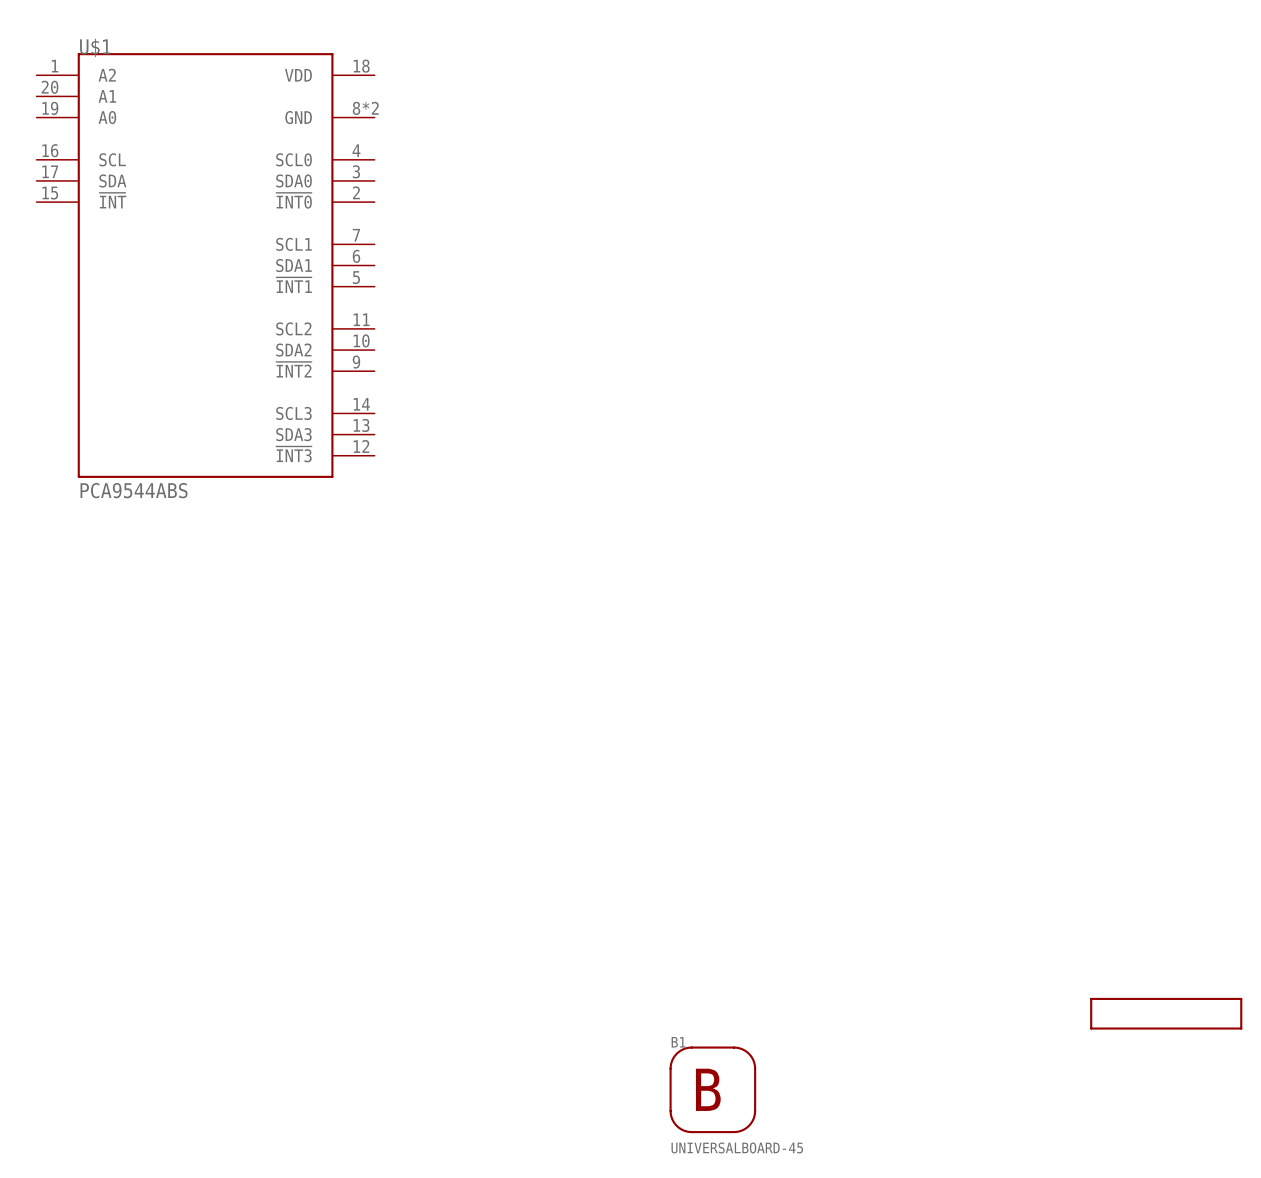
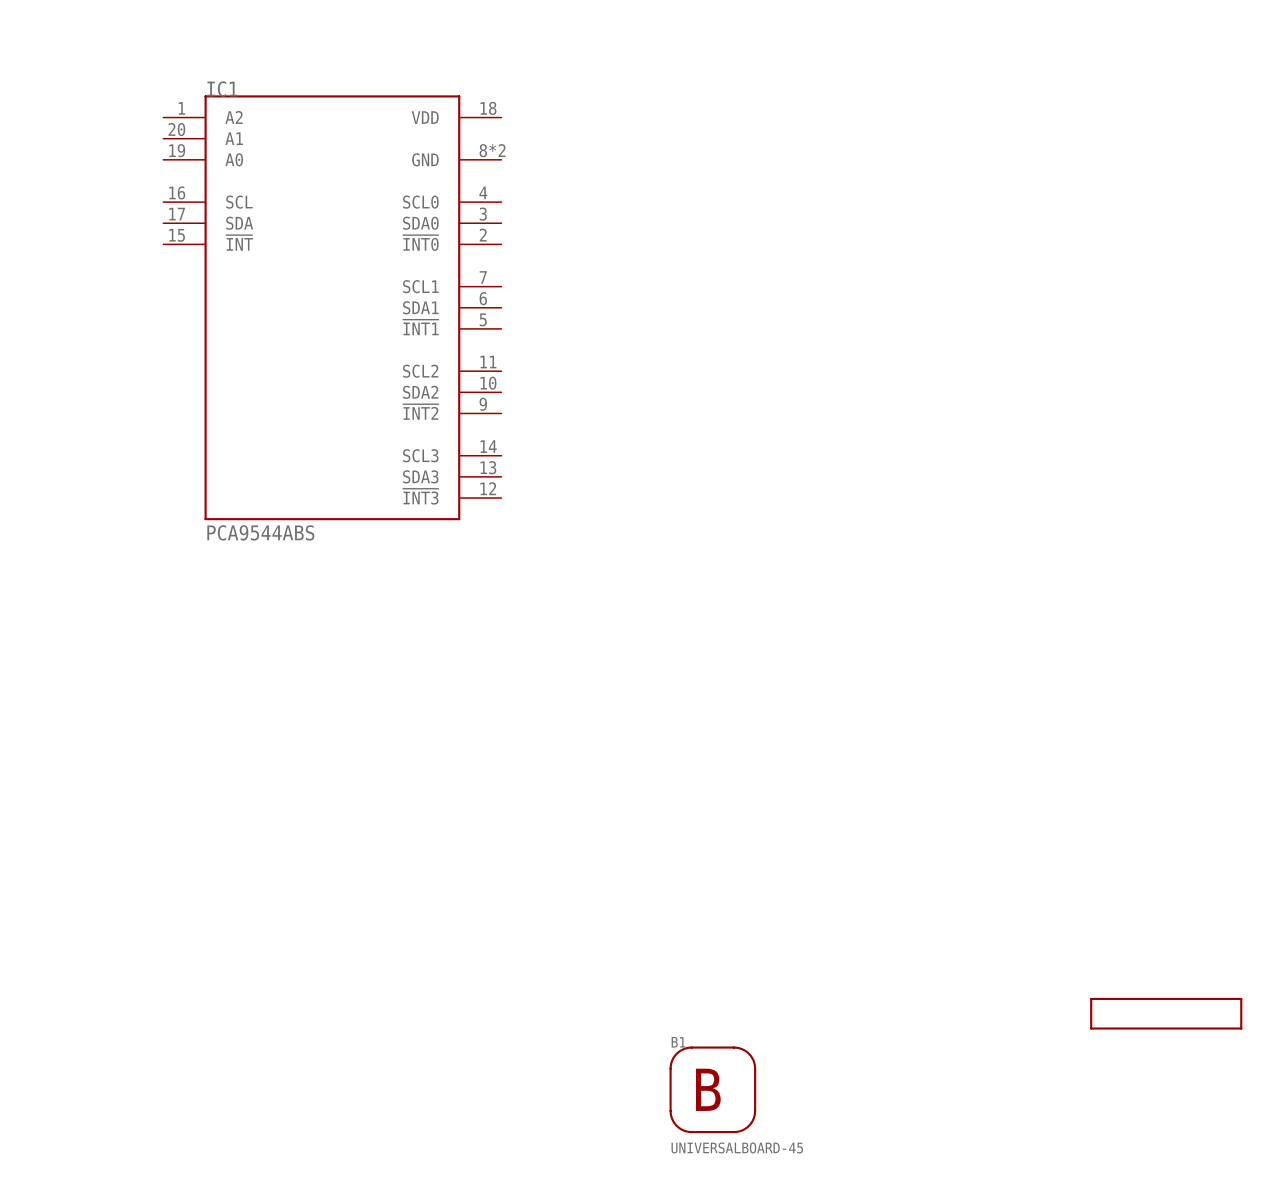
U$1: PCA9544ABS (205, 265) -> none
IC1: none -> PCA9544ABS (332, 307)

